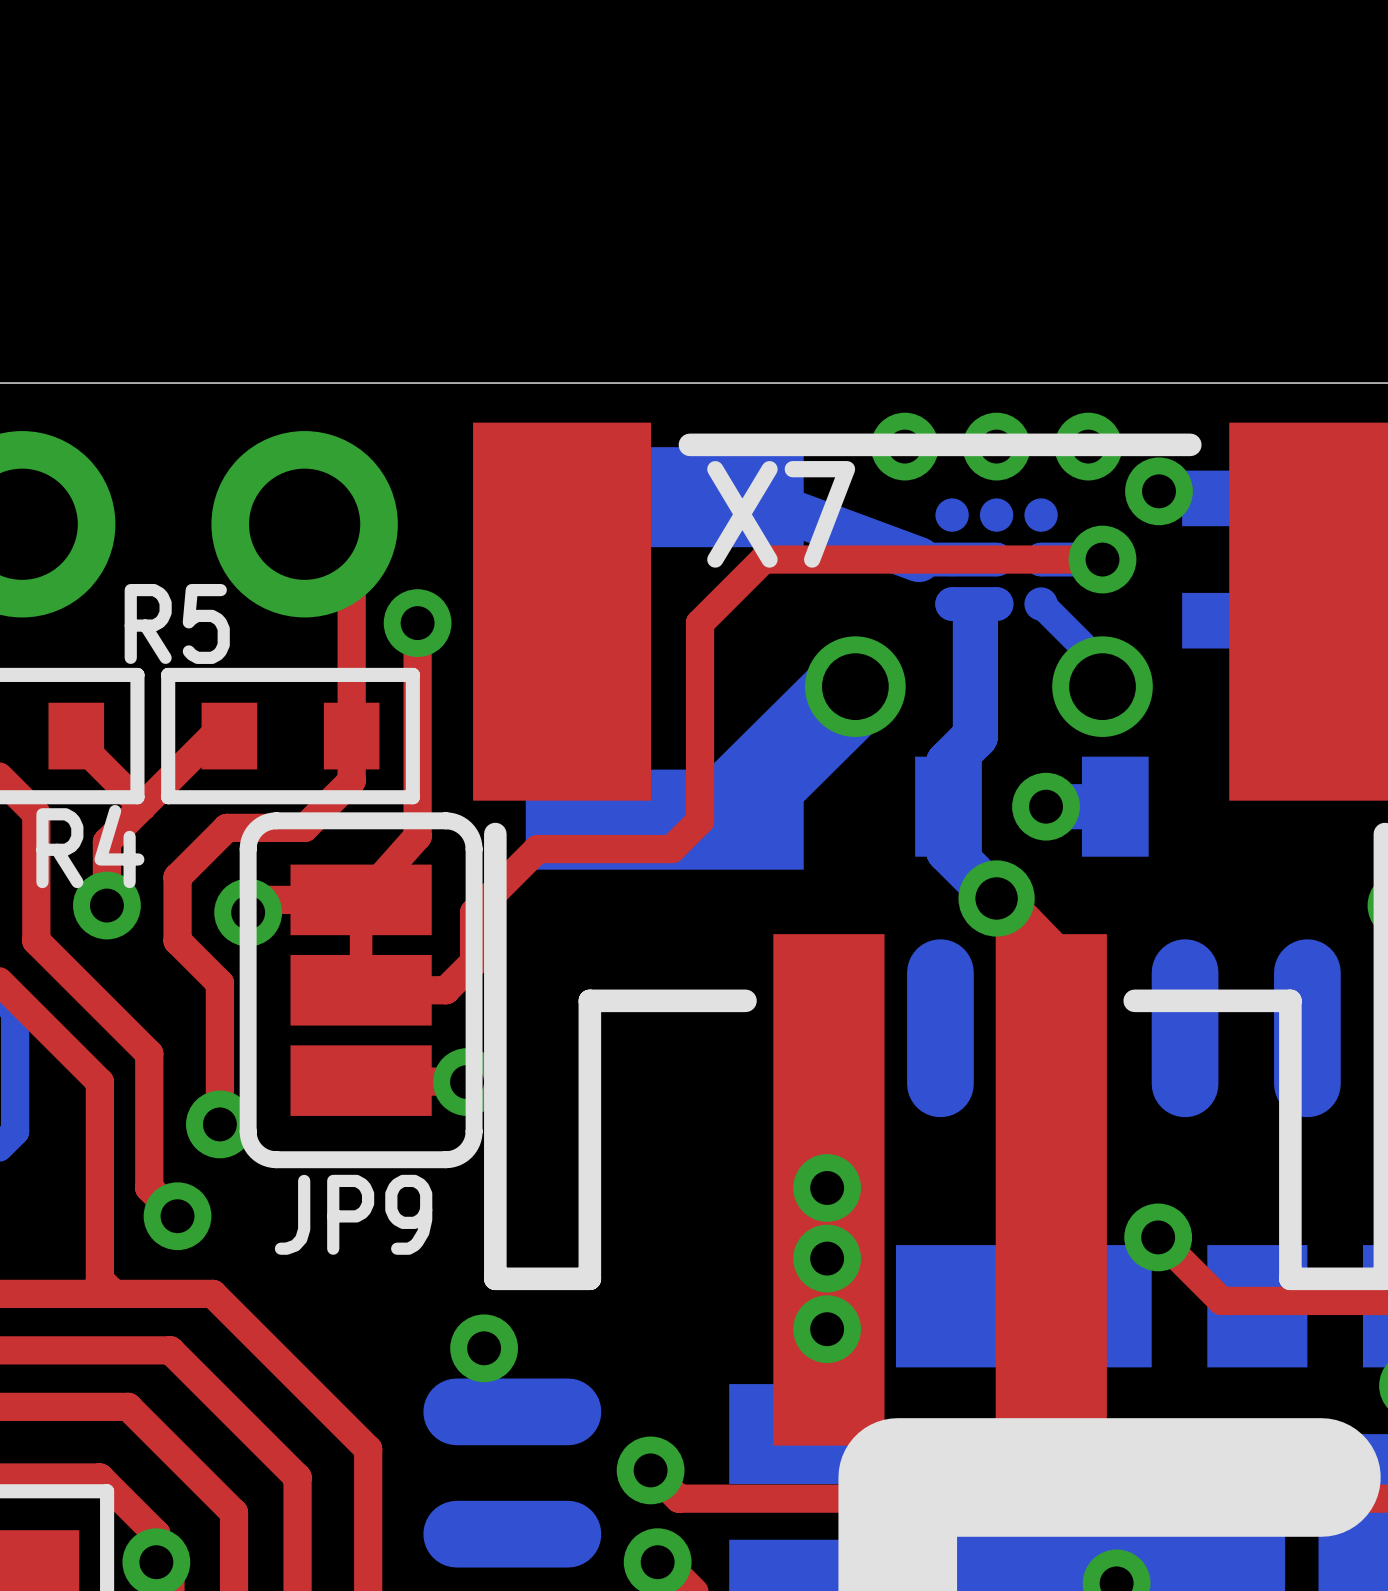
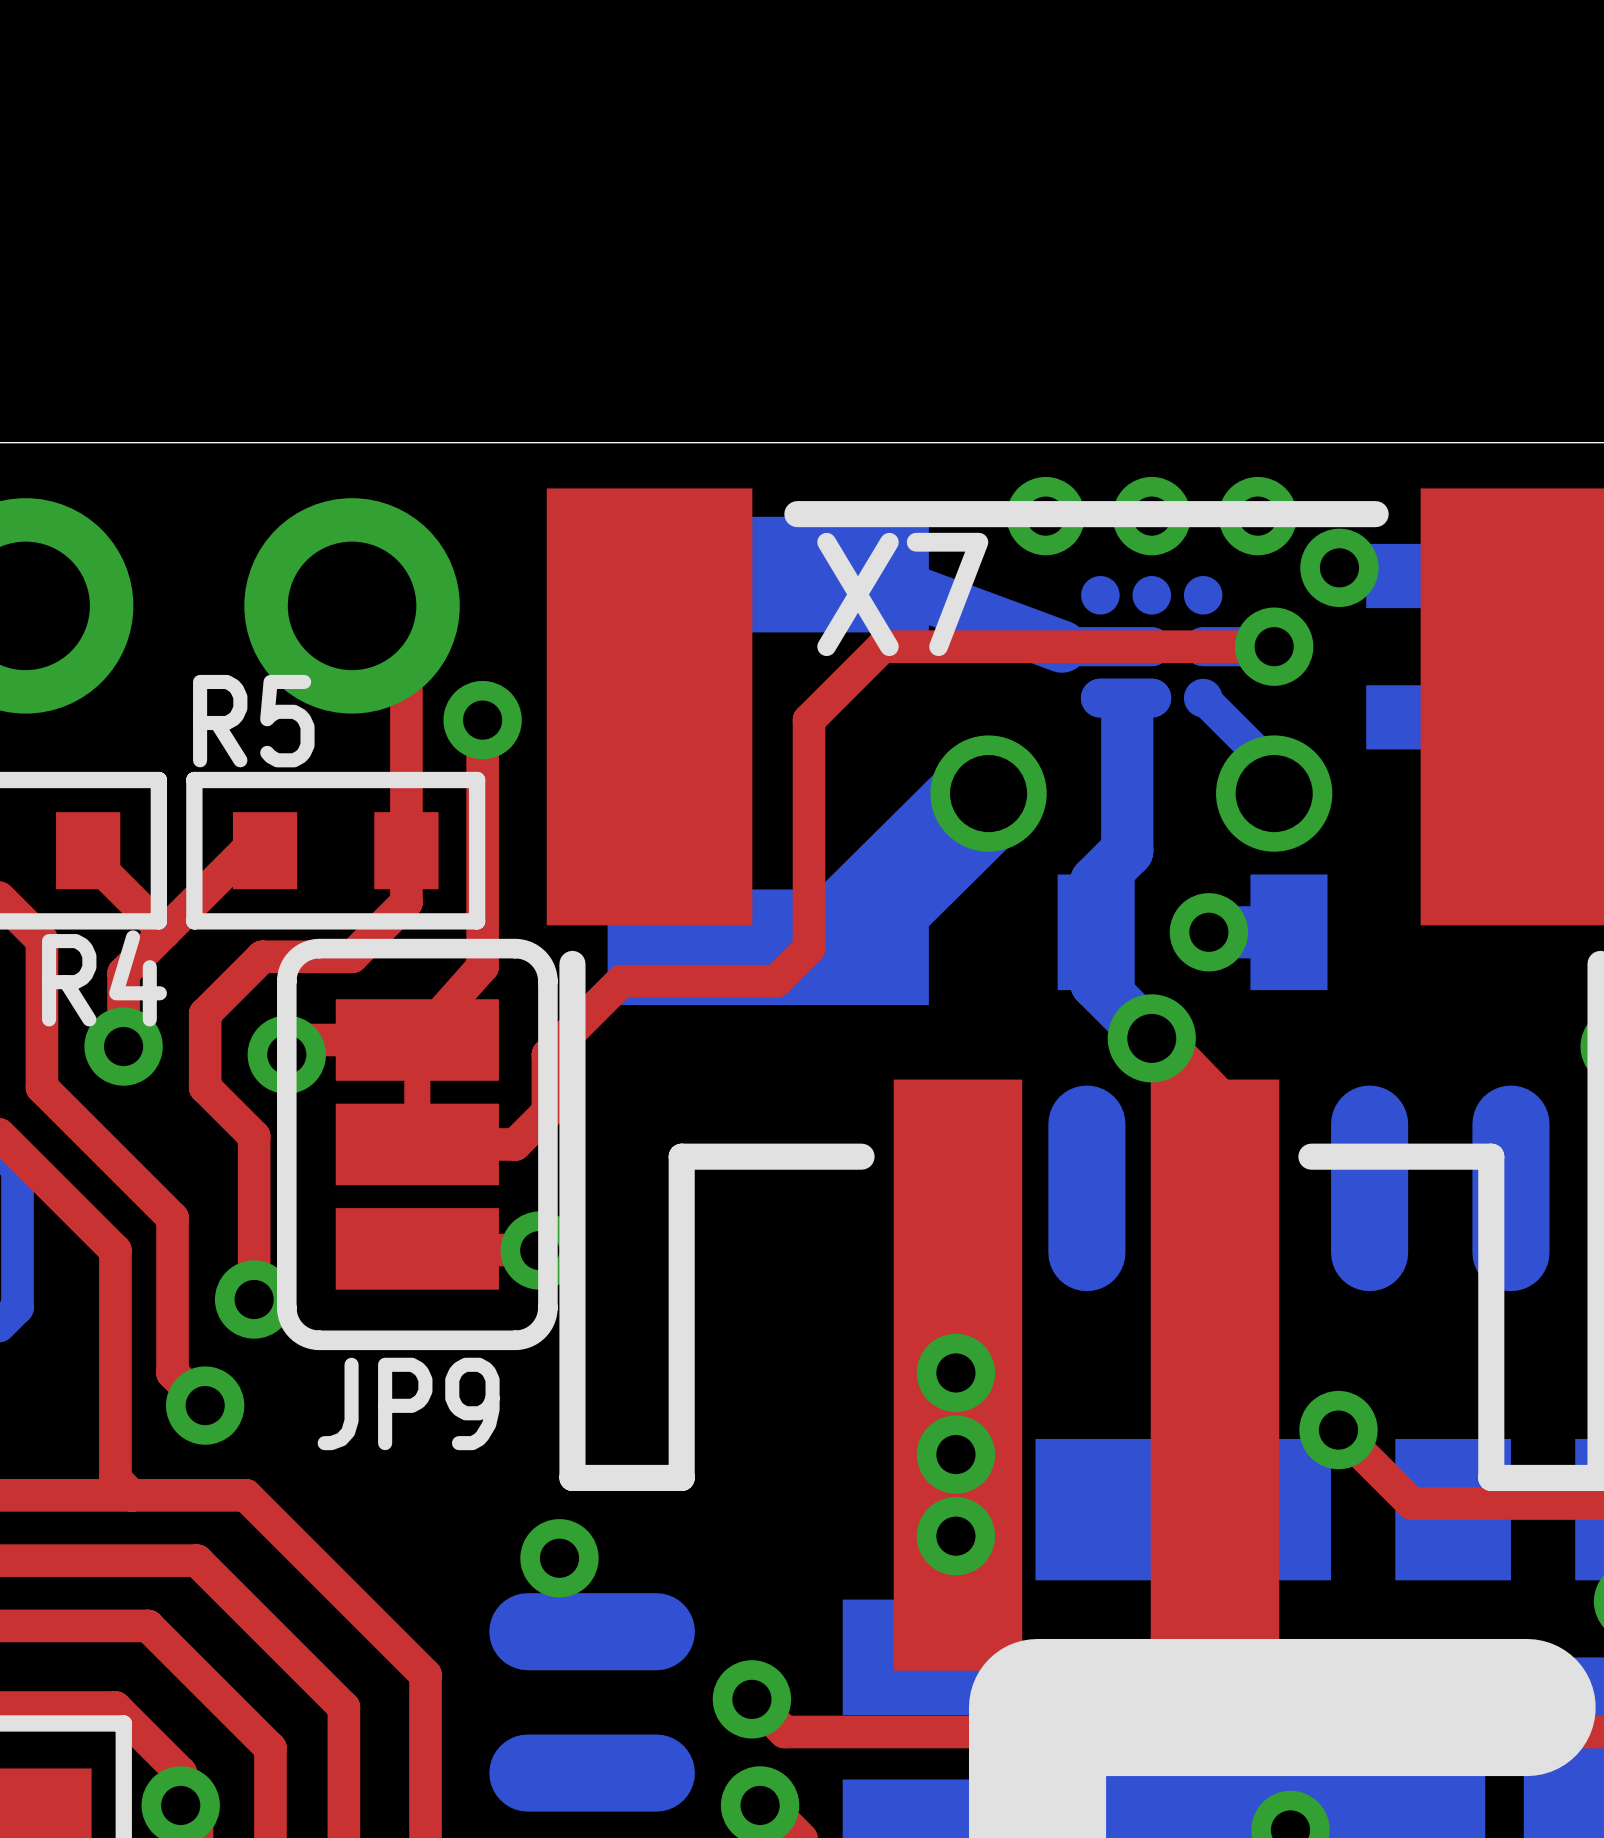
R5 name position: R5 (177, 623) -> R5 (253, 721)

